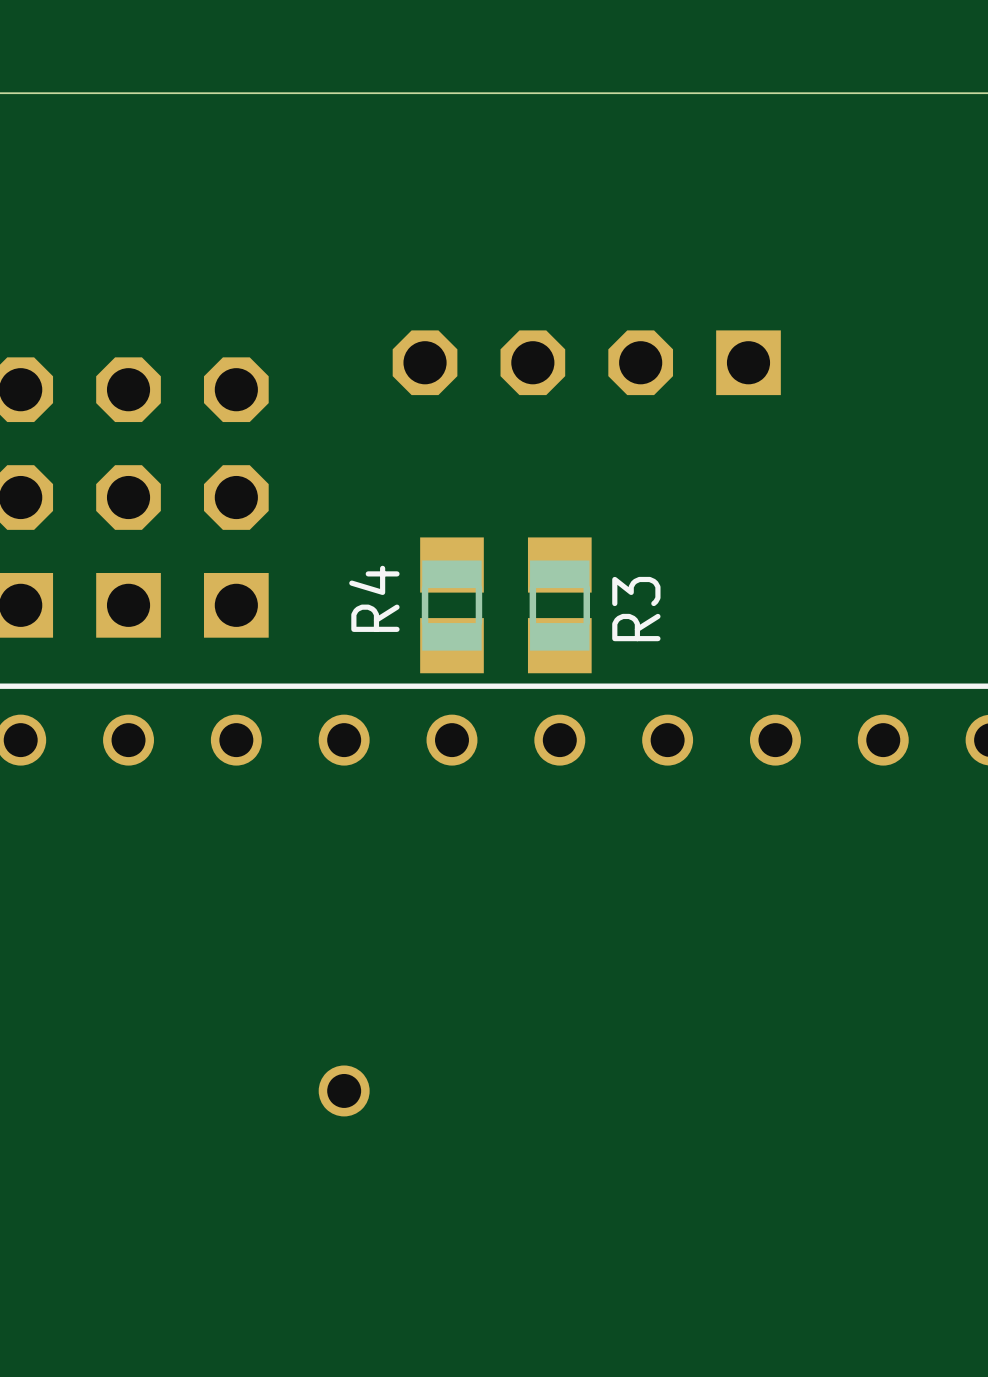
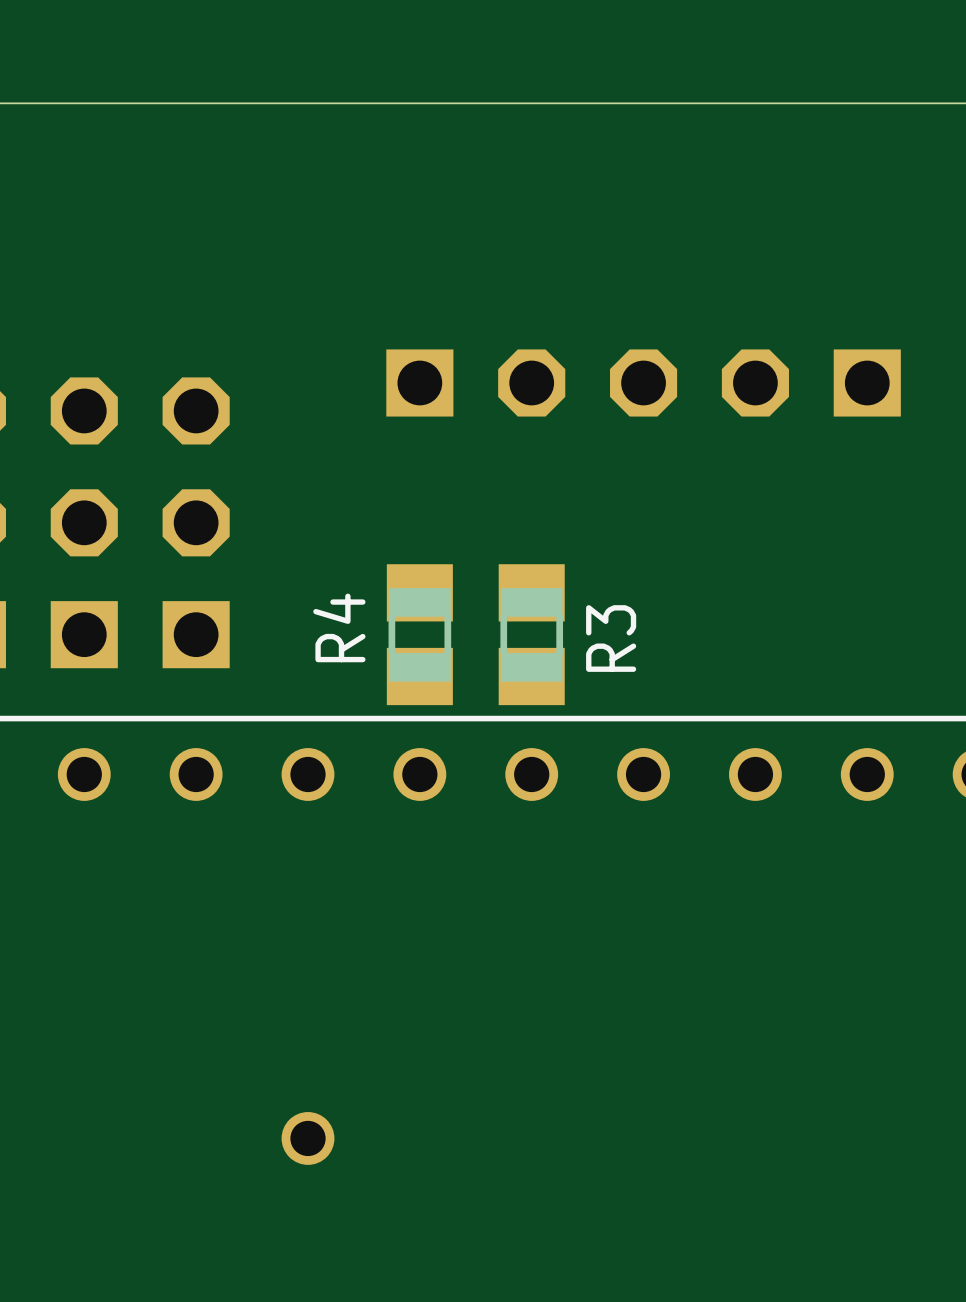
part: none -> (419, 382)
part position: (586, 362) -> (699, 382)

